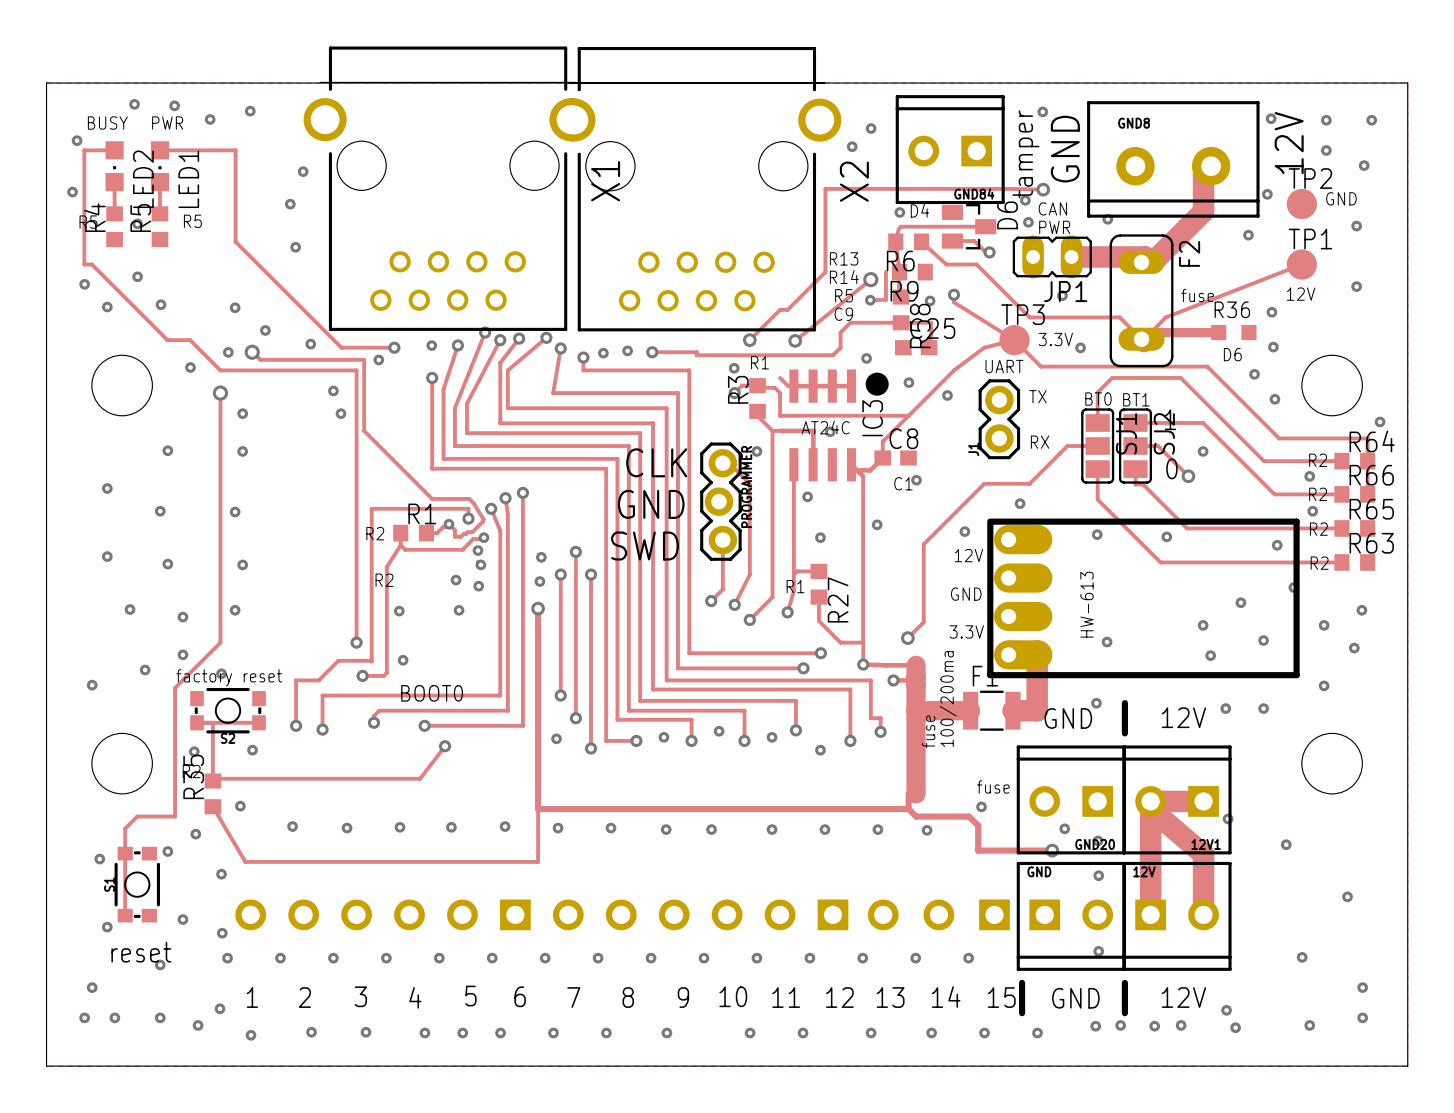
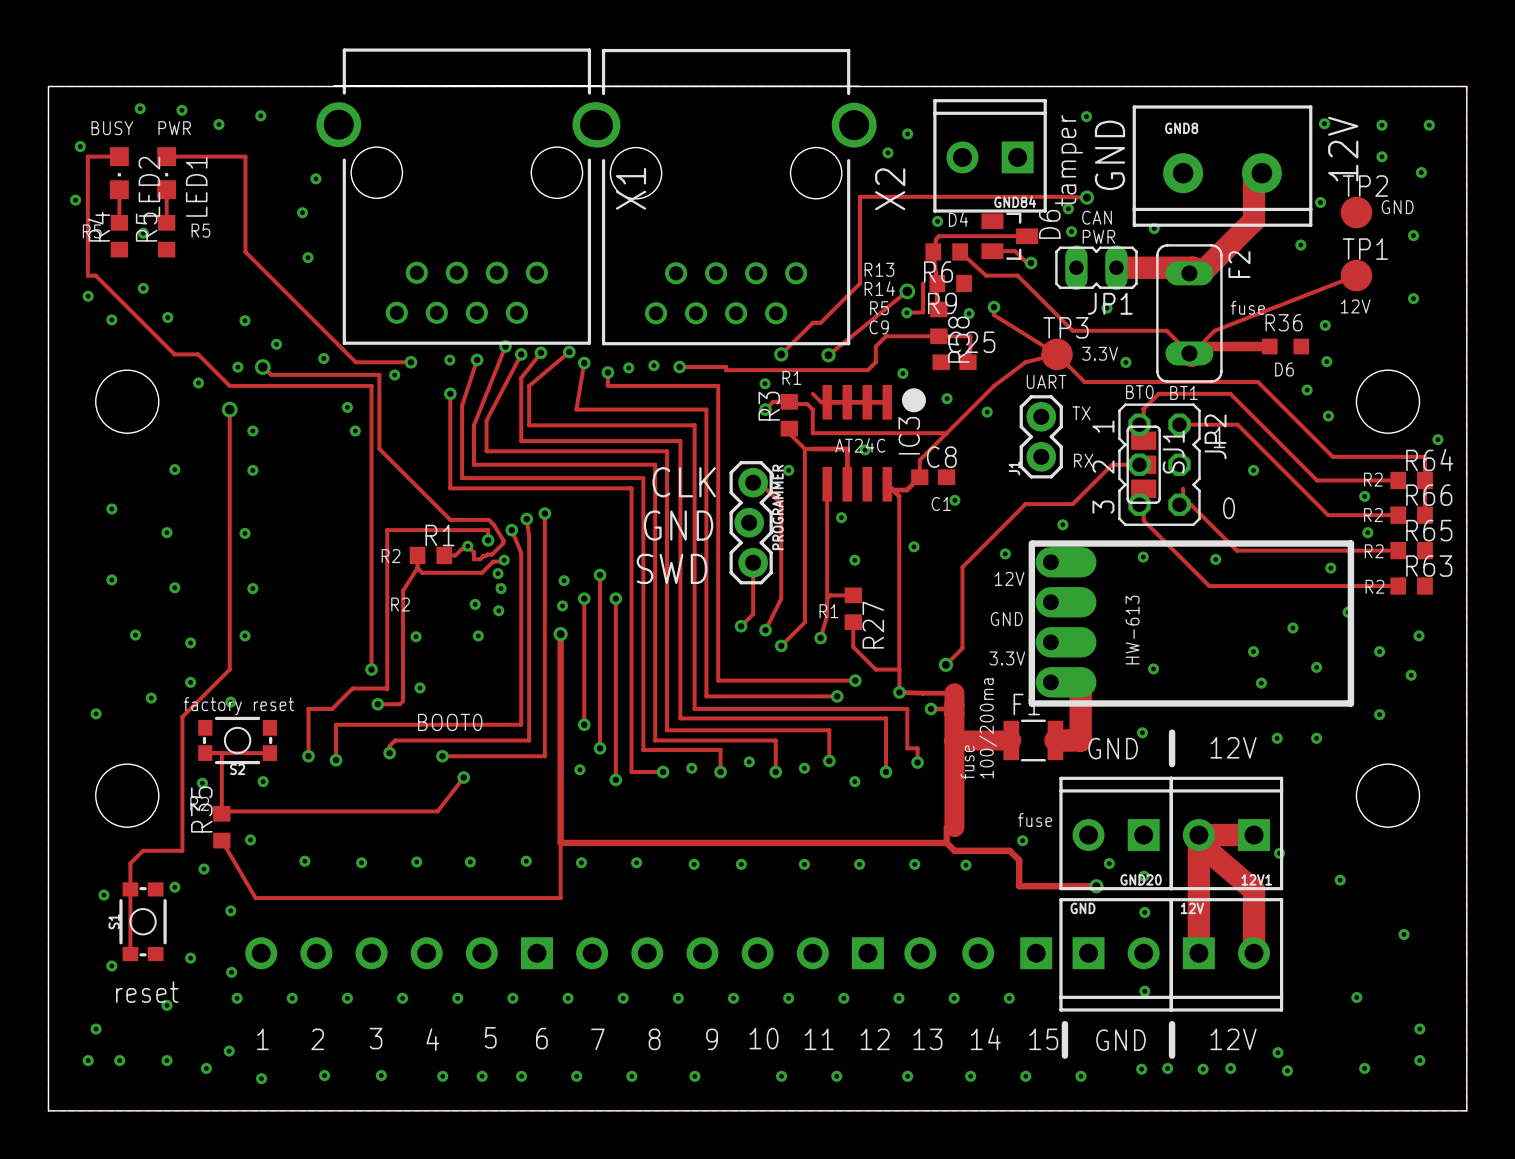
text position: BT0 (1098, 399) -> BT0 (1139, 392)
text position: BT1 (1136, 399) -> BT1 (1183, 392)
track: (1135, 422) (1203, 422) -> (1179, 424) (1237, 424) (1253, 440)
JP2: none -> (1159, 464)
track: (1135, 446) (1158, 446) (1188, 476) -> none
SJ2: (1135, 446) -> none
text position: 0 (1171, 468) -> 0 (1228, 508)
via: (1188, 476) -> none

